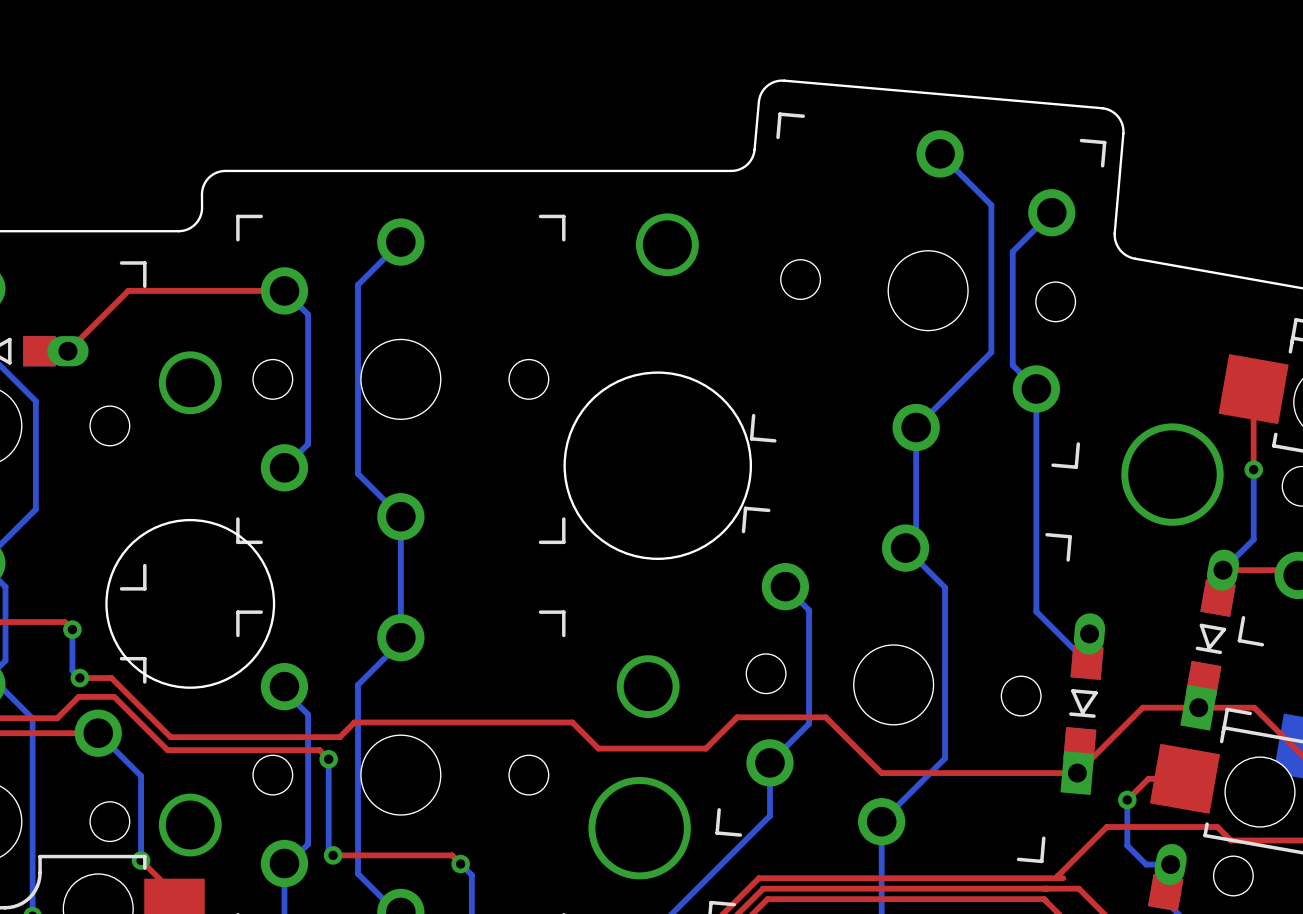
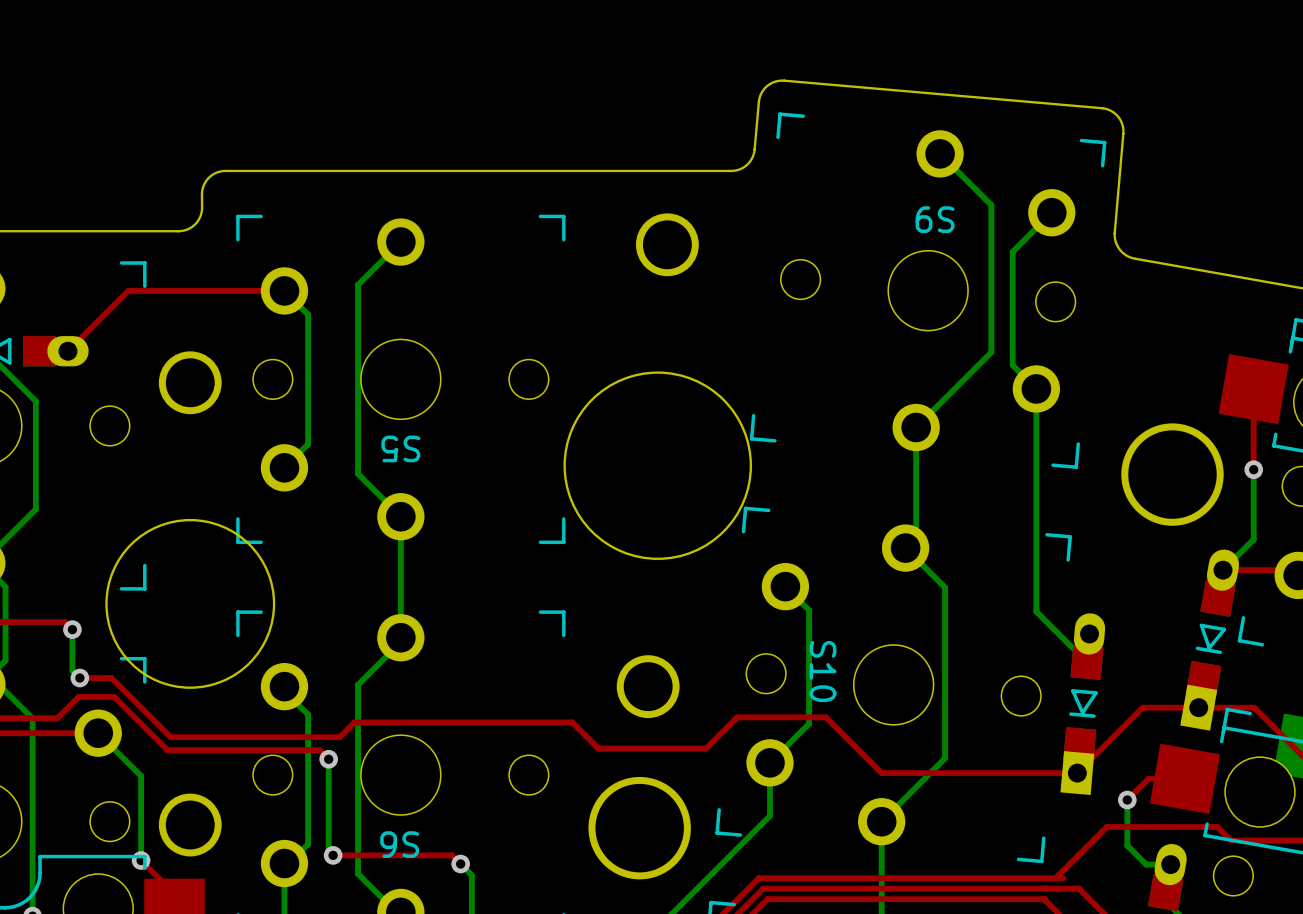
text: none -> S9 (935, 219)
text: none -> S5 (400, 448)
text: none -> S10 (823, 671)
text: none -> S6 (399, 844)

